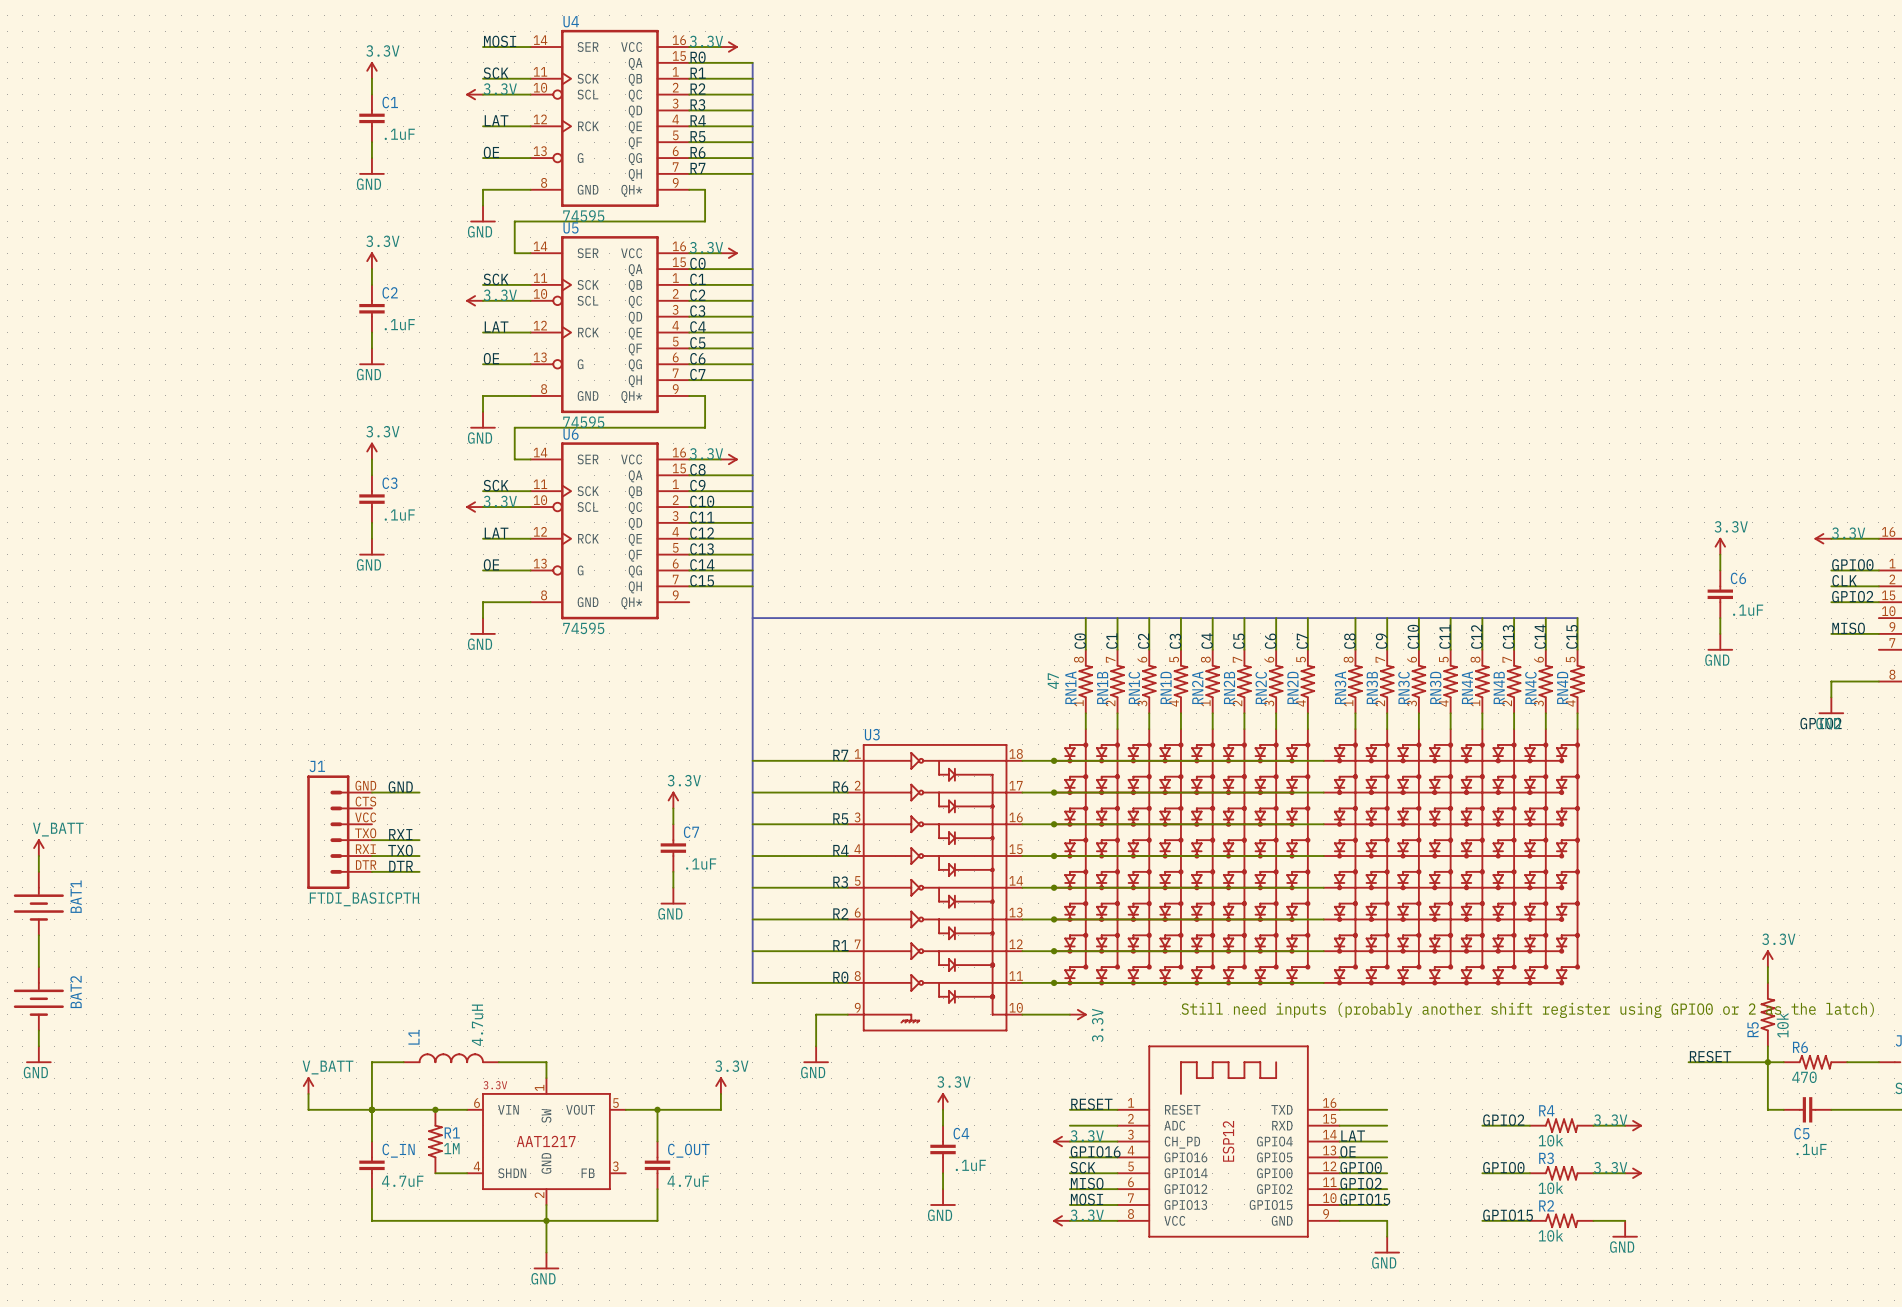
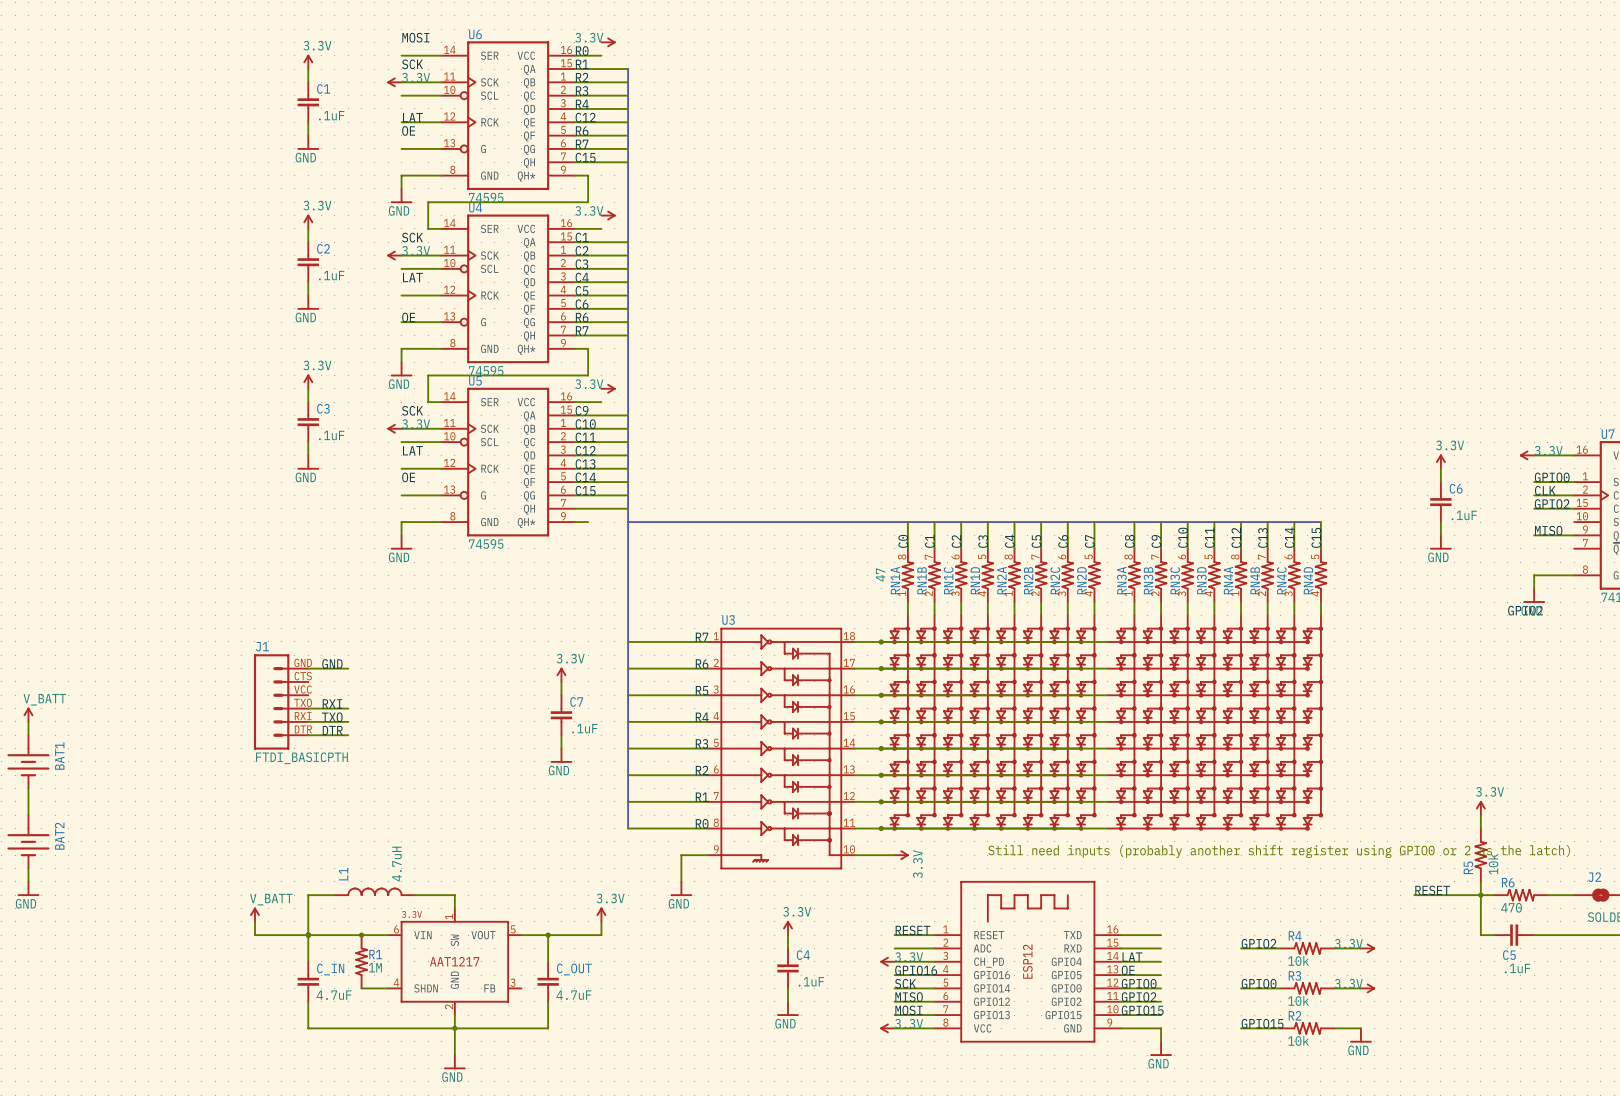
wire: (483, 47) (530, 47) -> (401, 55) (441, 55)
wire: (689, 47) (720, 47) -> none
wire: (720, 62) (752, 62) -> none
bus: (752, 62) (752, 78) -> none
wire: (483, 78) (530, 78) -> (401, 95) (441, 95)
U4 position: (609, 118) -> (508, 288)
label position: LAT (496, 120) -> LAT (412, 117)
wire: (483, 126) (530, 126) -> (401, 122) (441, 122)
label: R5 (697, 136) -> C12 (585, 117)
wire: (483, 158) (530, 158) -> (401, 148) (441, 148)
label: none -> C15 (585, 157)
wire: (530, 189) (483, 189) (483, 205) -> (441, 175) (401, 175) (401, 188)
wire: (705, 189) (705, 205) -> (574, 175) (588, 175)
wire: none -> (588, 162) (628, 162)
power symbol position: GND (483, 213) -> GND (401, 195)
wire: (705, 221) (514, 221) (514, 237) -> (588, 188) (588, 202) (428, 202)
wire: (514, 253) (530, 253) -> (428, 215) (428, 228) (441, 228)
wire: (689, 253) (720, 253) -> none
label: C0 (697, 263) -> none
wire: (720, 269) (752, 269) -> none
wire: (483, 284) (530, 284) -> (401, 268) (441, 268)
U5 position: (609, 324) -> (508, 462)
wire: (483, 332) (530, 332) -> (401, 295) (441, 295)
label position: OE (491, 358) -> OE (408, 317)
wire: (483, 364) (530, 364) -> (401, 322) (441, 322)
label: C7 (697, 374) -> R6 (582, 317)
label: none -> R7 (582, 330)
wire: (530, 395) (483, 395) (483, 411) -> (441, 348) (401, 348) (401, 362)
wire: (705, 395) (705, 411) -> (574, 348) (588, 348)
wire: none -> (588, 335) (628, 335)
power symbol position: GND (483, 420) -> GND (401, 369)
wire: (705, 427) (514, 427) (514, 443) -> (588, 362) (588, 375) (428, 375)
wire: (514, 459) (530, 459) -> (428, 388) (428, 402) (441, 402)
wire: (689, 459) (720, 459) -> none
label: C8 (697, 469) -> none
wire: (720, 475) (752, 475) -> none
wire: (483, 491) (530, 491) -> (401, 442) (441, 442)
U6 position: (609, 530) -> (508, 115)
wire: (483, 538) (530, 538) -> (401, 468) (441, 468)
wire: (483, 570) (530, 570) -> (401, 495) (441, 495)
wire: (530, 602) (483, 602) (483, 618) -> (441, 522) (401, 522) (401, 535)
wire: none -> (574, 508) (628, 508)
wire: none -> (574, 522) (588, 522)
power symbol position: GND (483, 626) -> GND (401, 542)

